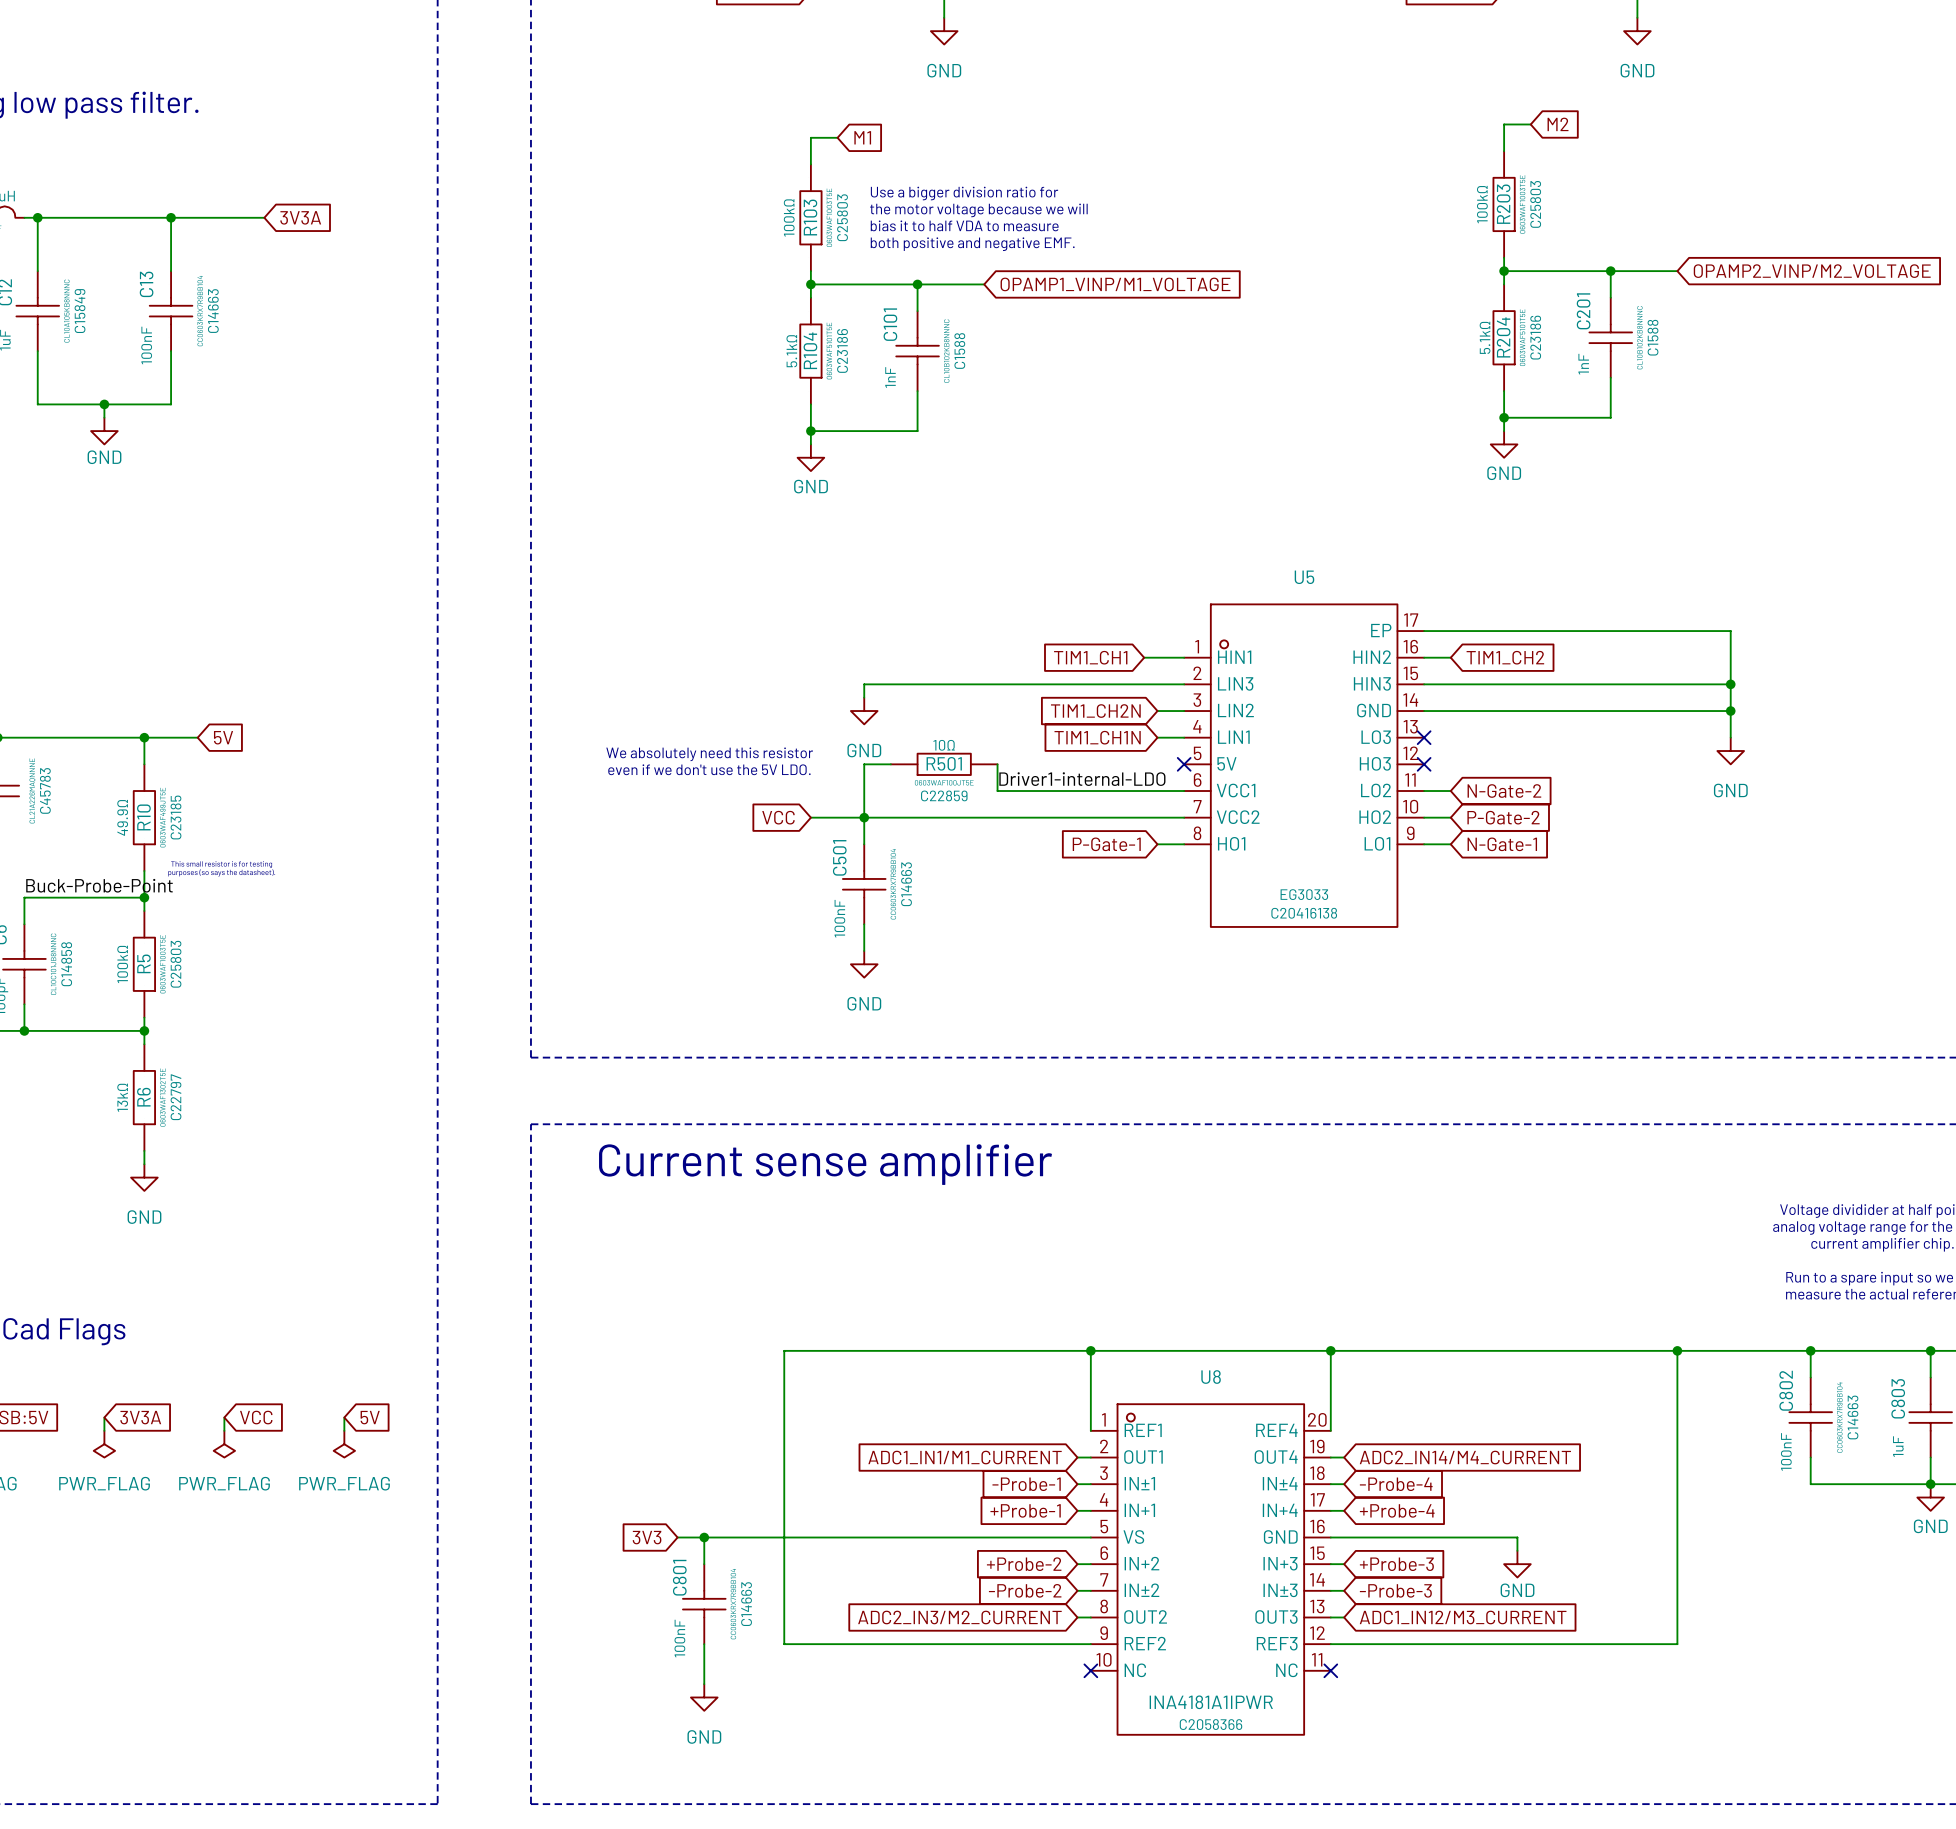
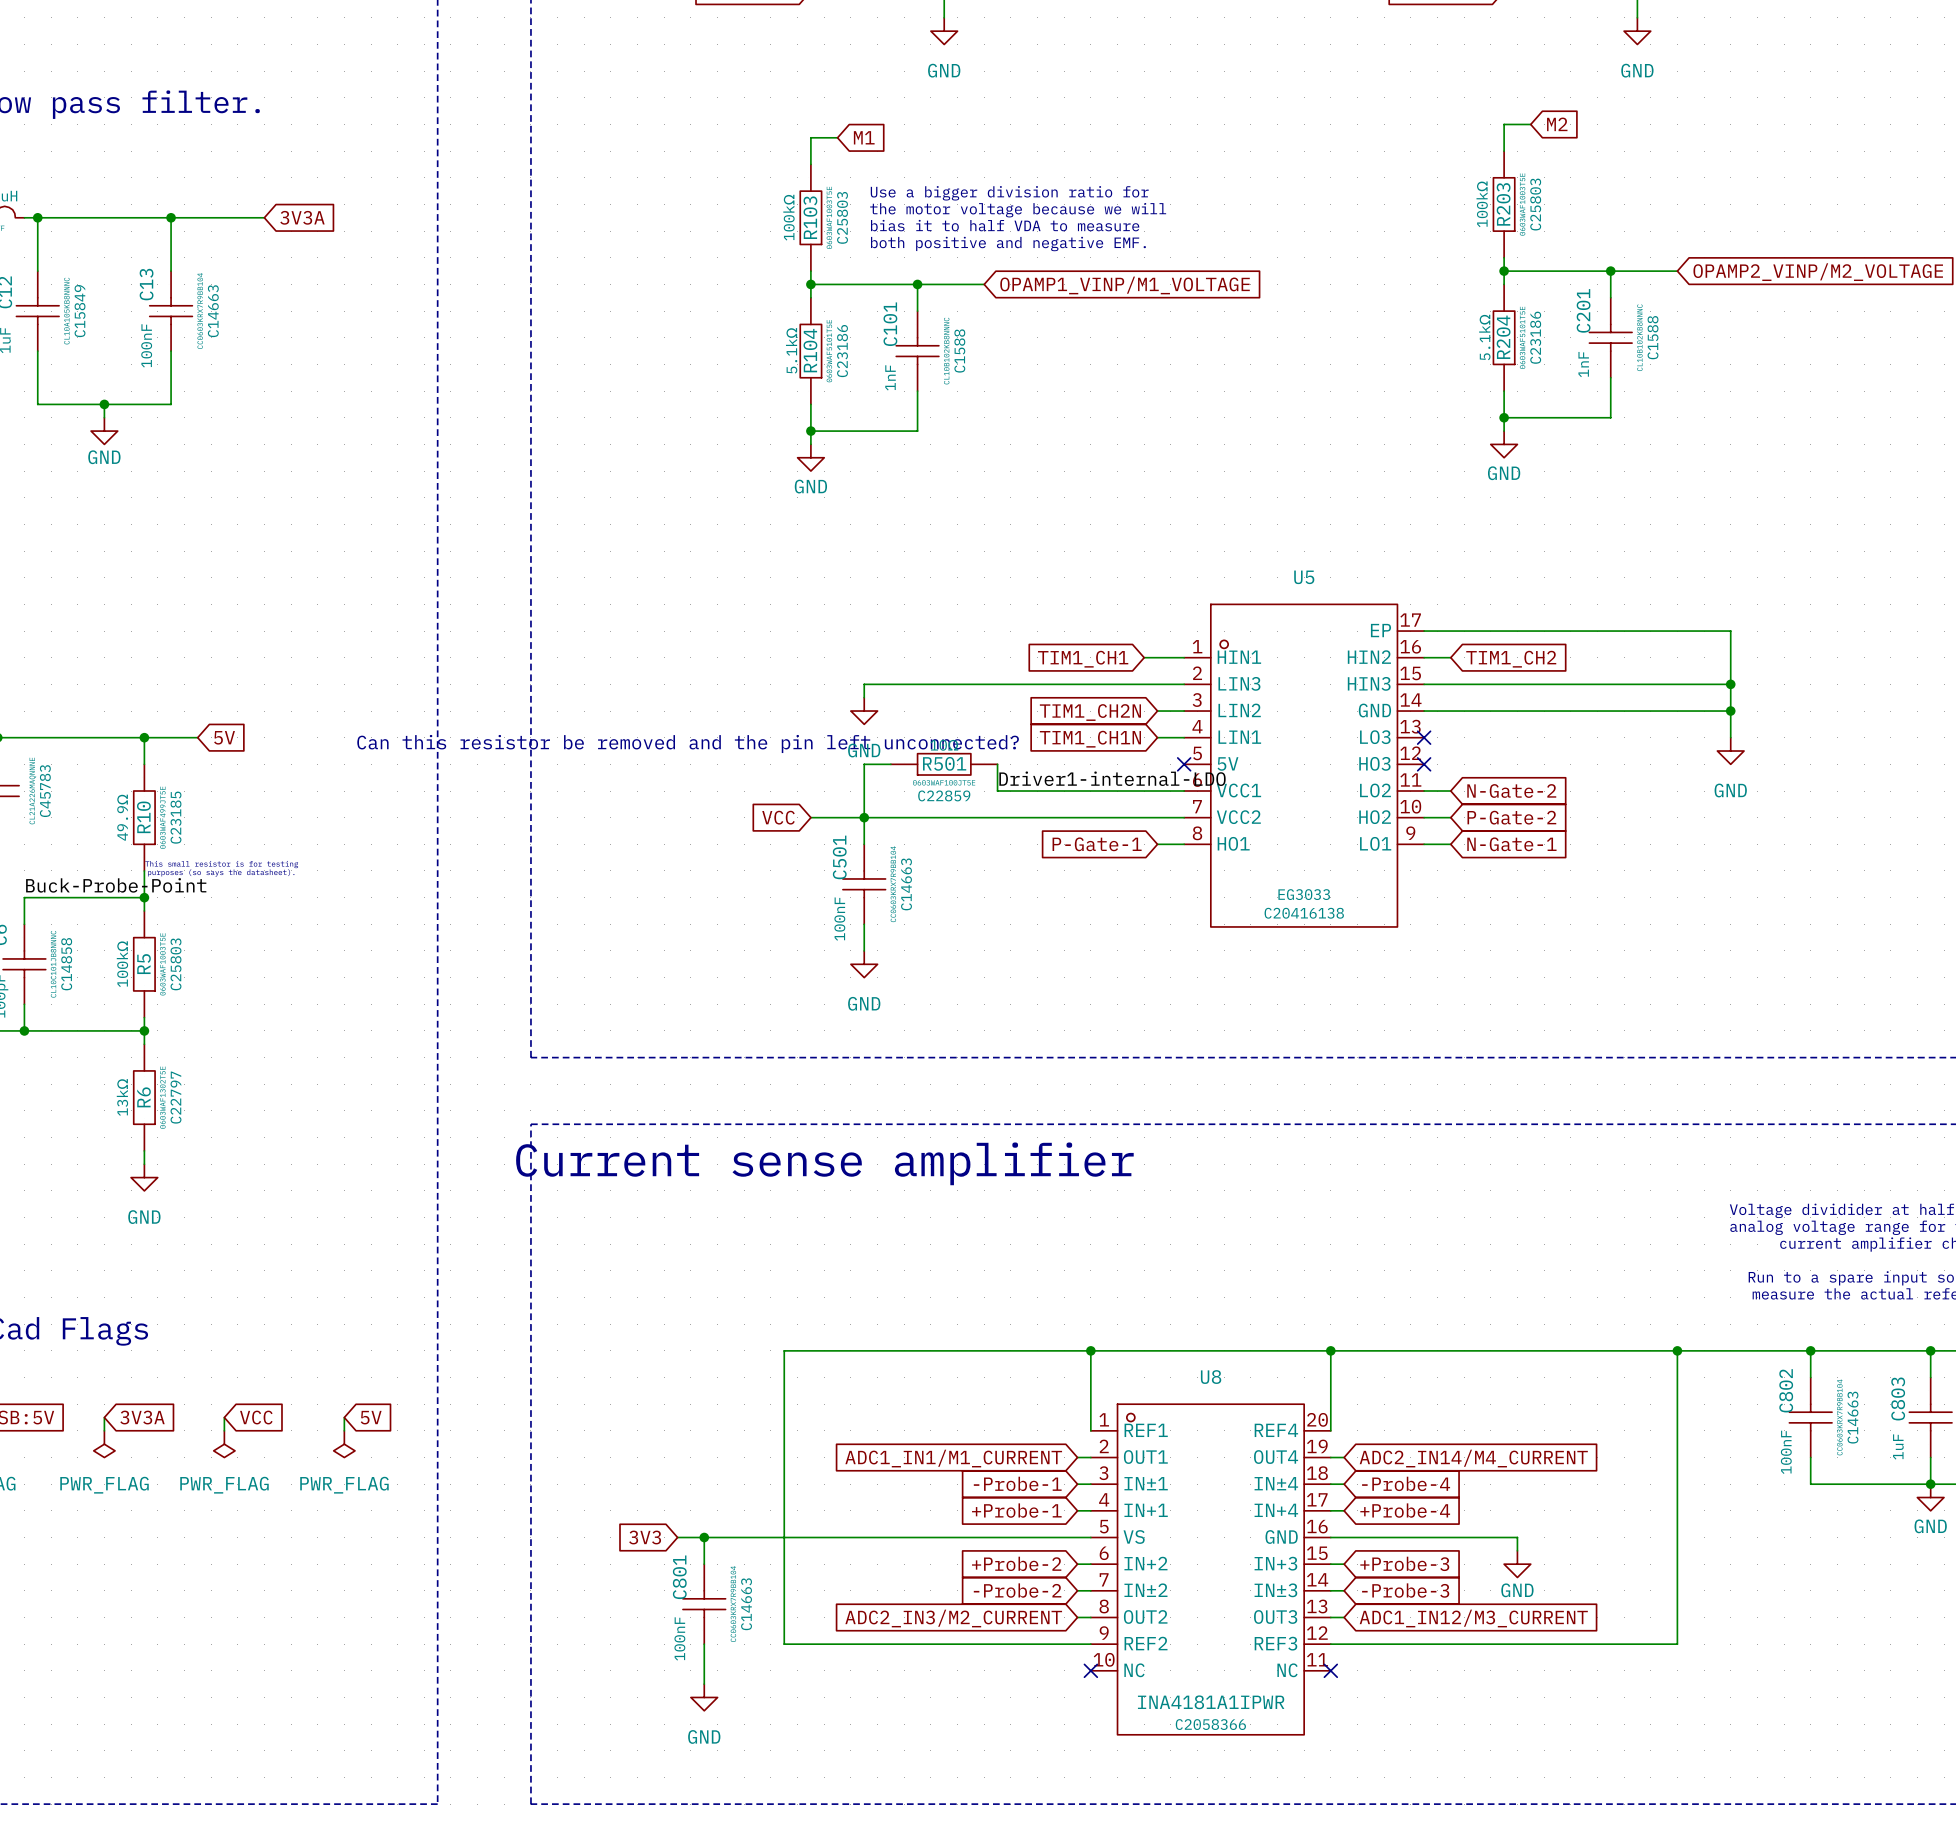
text: none -> Can this resistor be removed and the pin left unconnected? (688, 743)
text: We absolutely need this resistor (709, 754) -> none
text: even if we don't use the 5V LDO. (709, 769) -> none

